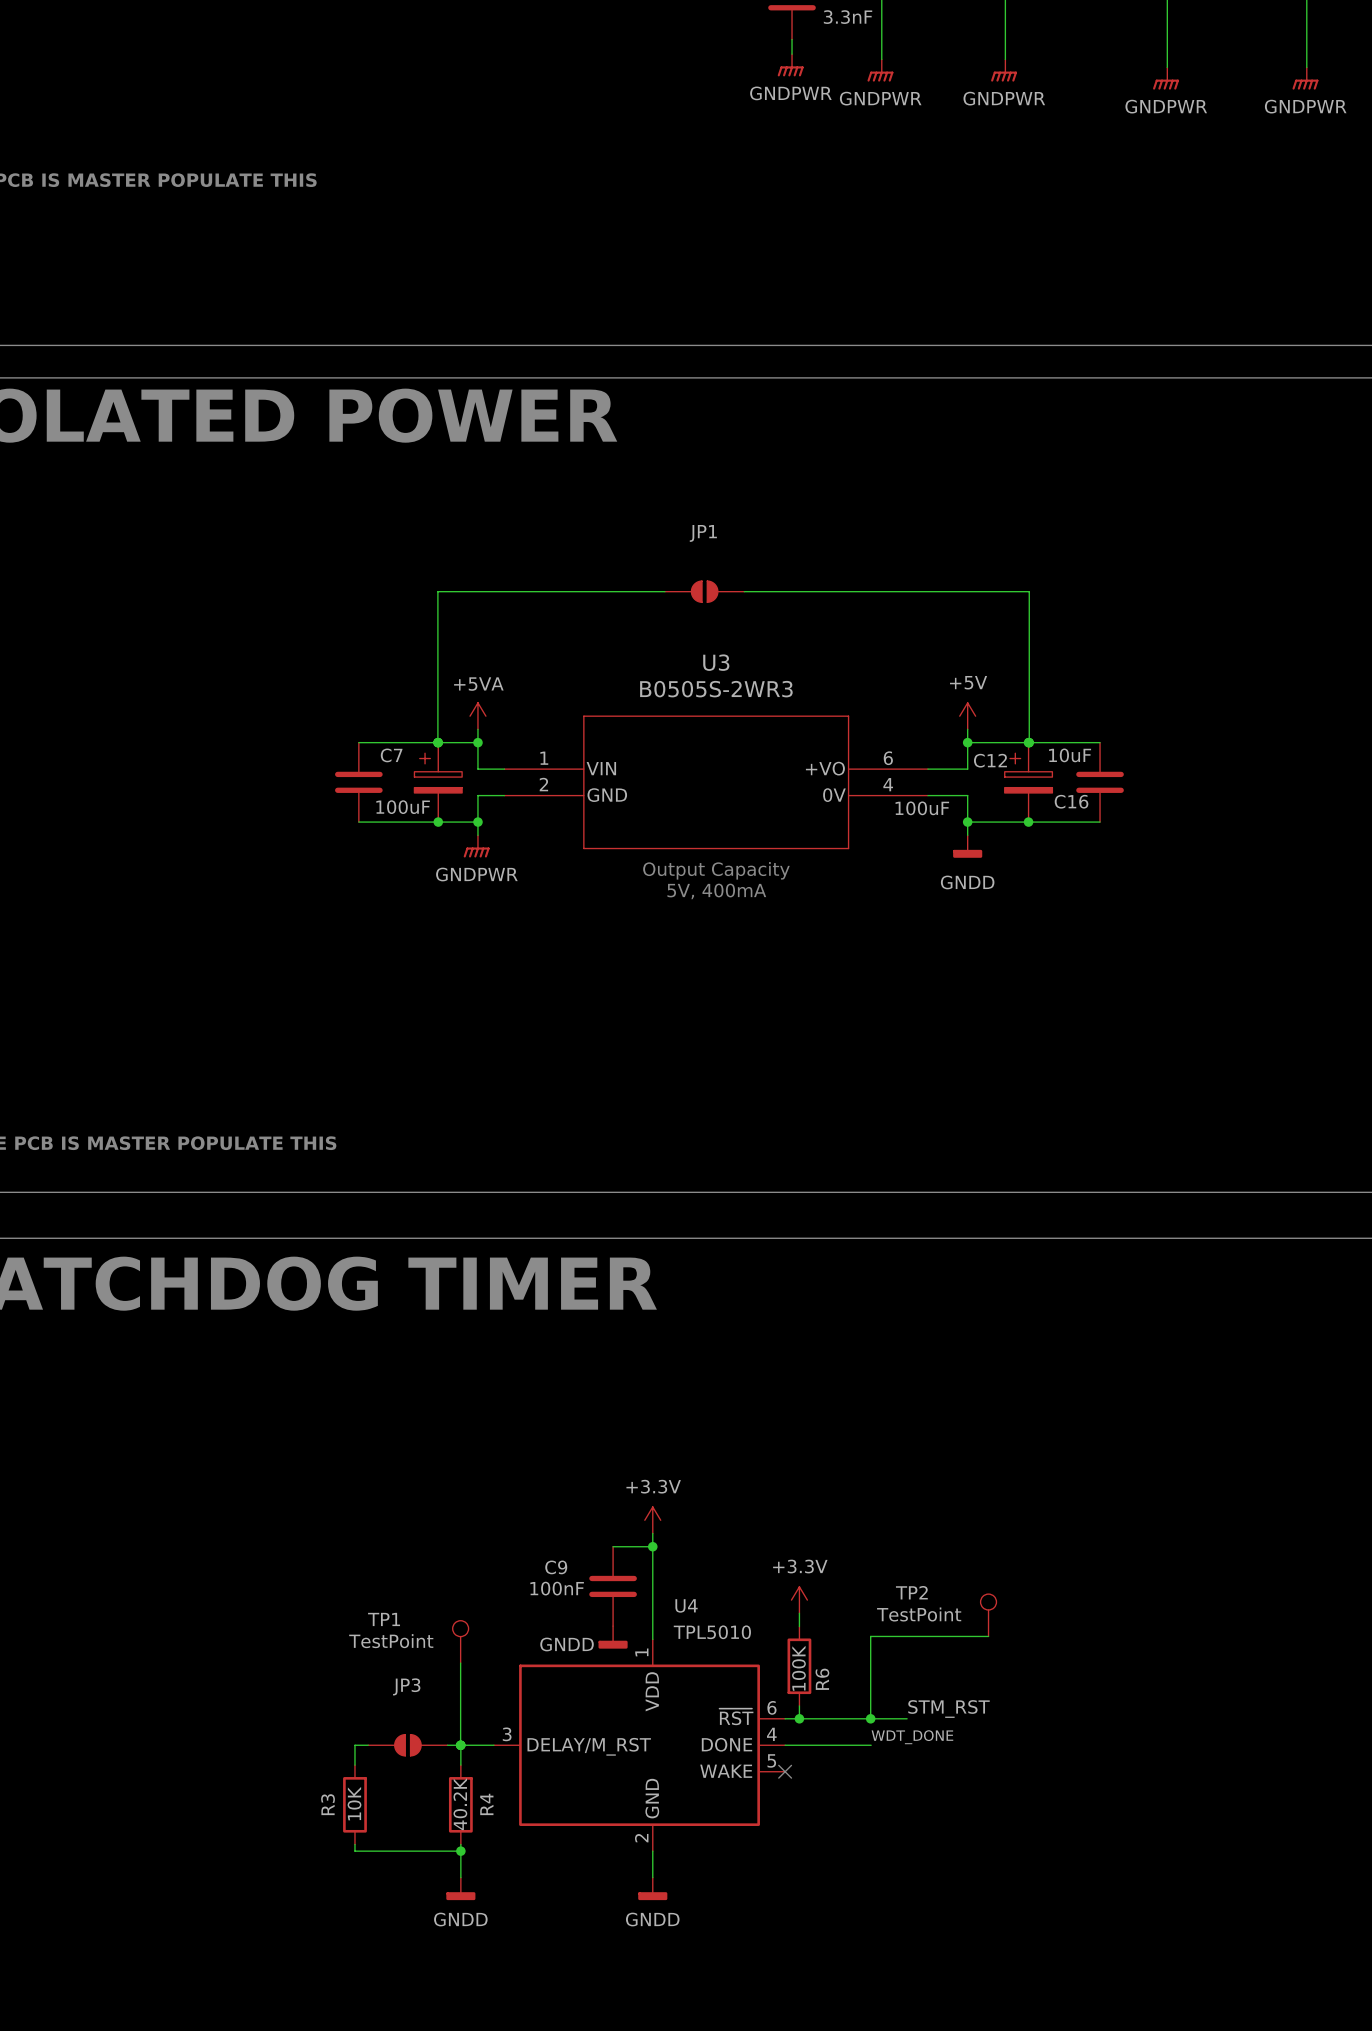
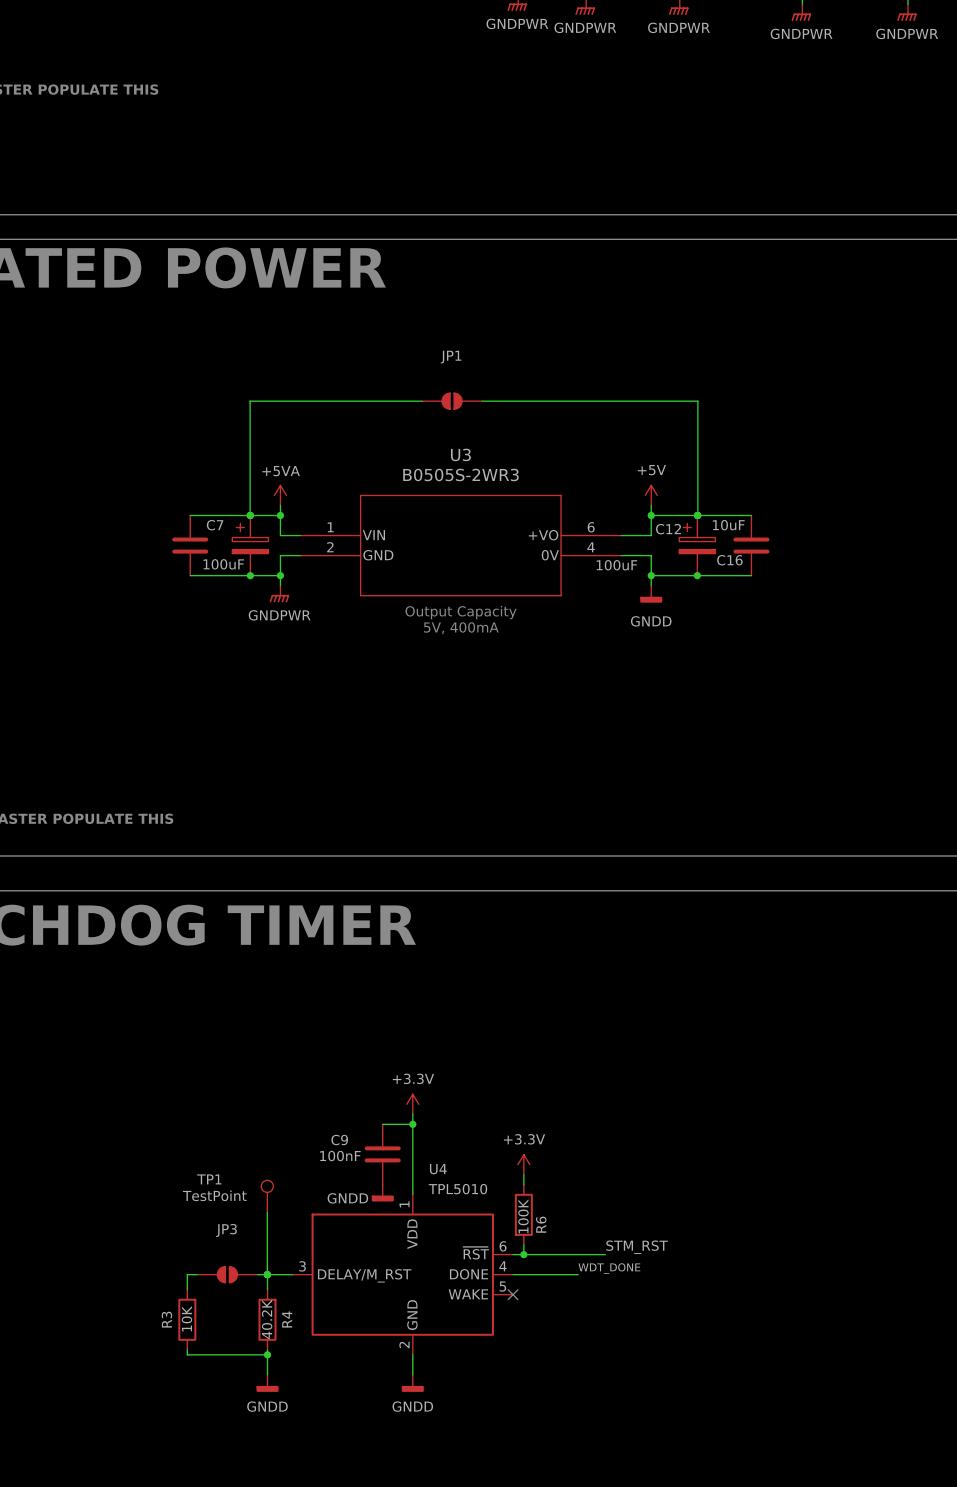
TP2: TestPoint (988, 1615) -> none
wire: (988, 1636) (870, 1636) (870, 1718) -> none
junction: (870, 1718) -> none

